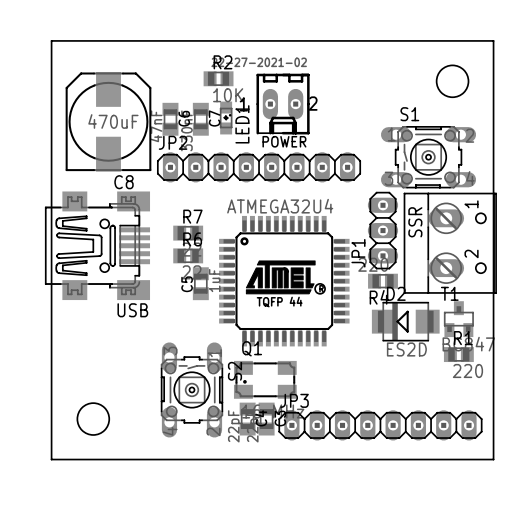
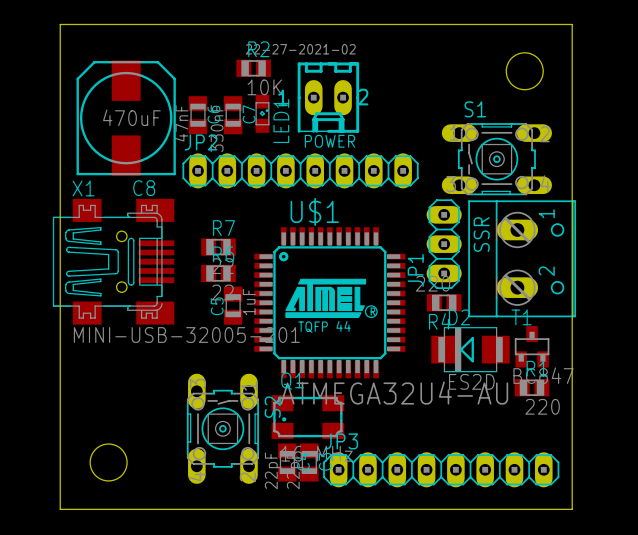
U$1 name: none -> U$1 (314, 211)
U$1 value: ATMEGA32U4 (280, 206) -> ATMEGA32U4-AU (394, 393)
USB value: none -> MINI-USB-32005-201 (186, 335)
USB name: USB (132, 310) -> X1 (83, 188)

